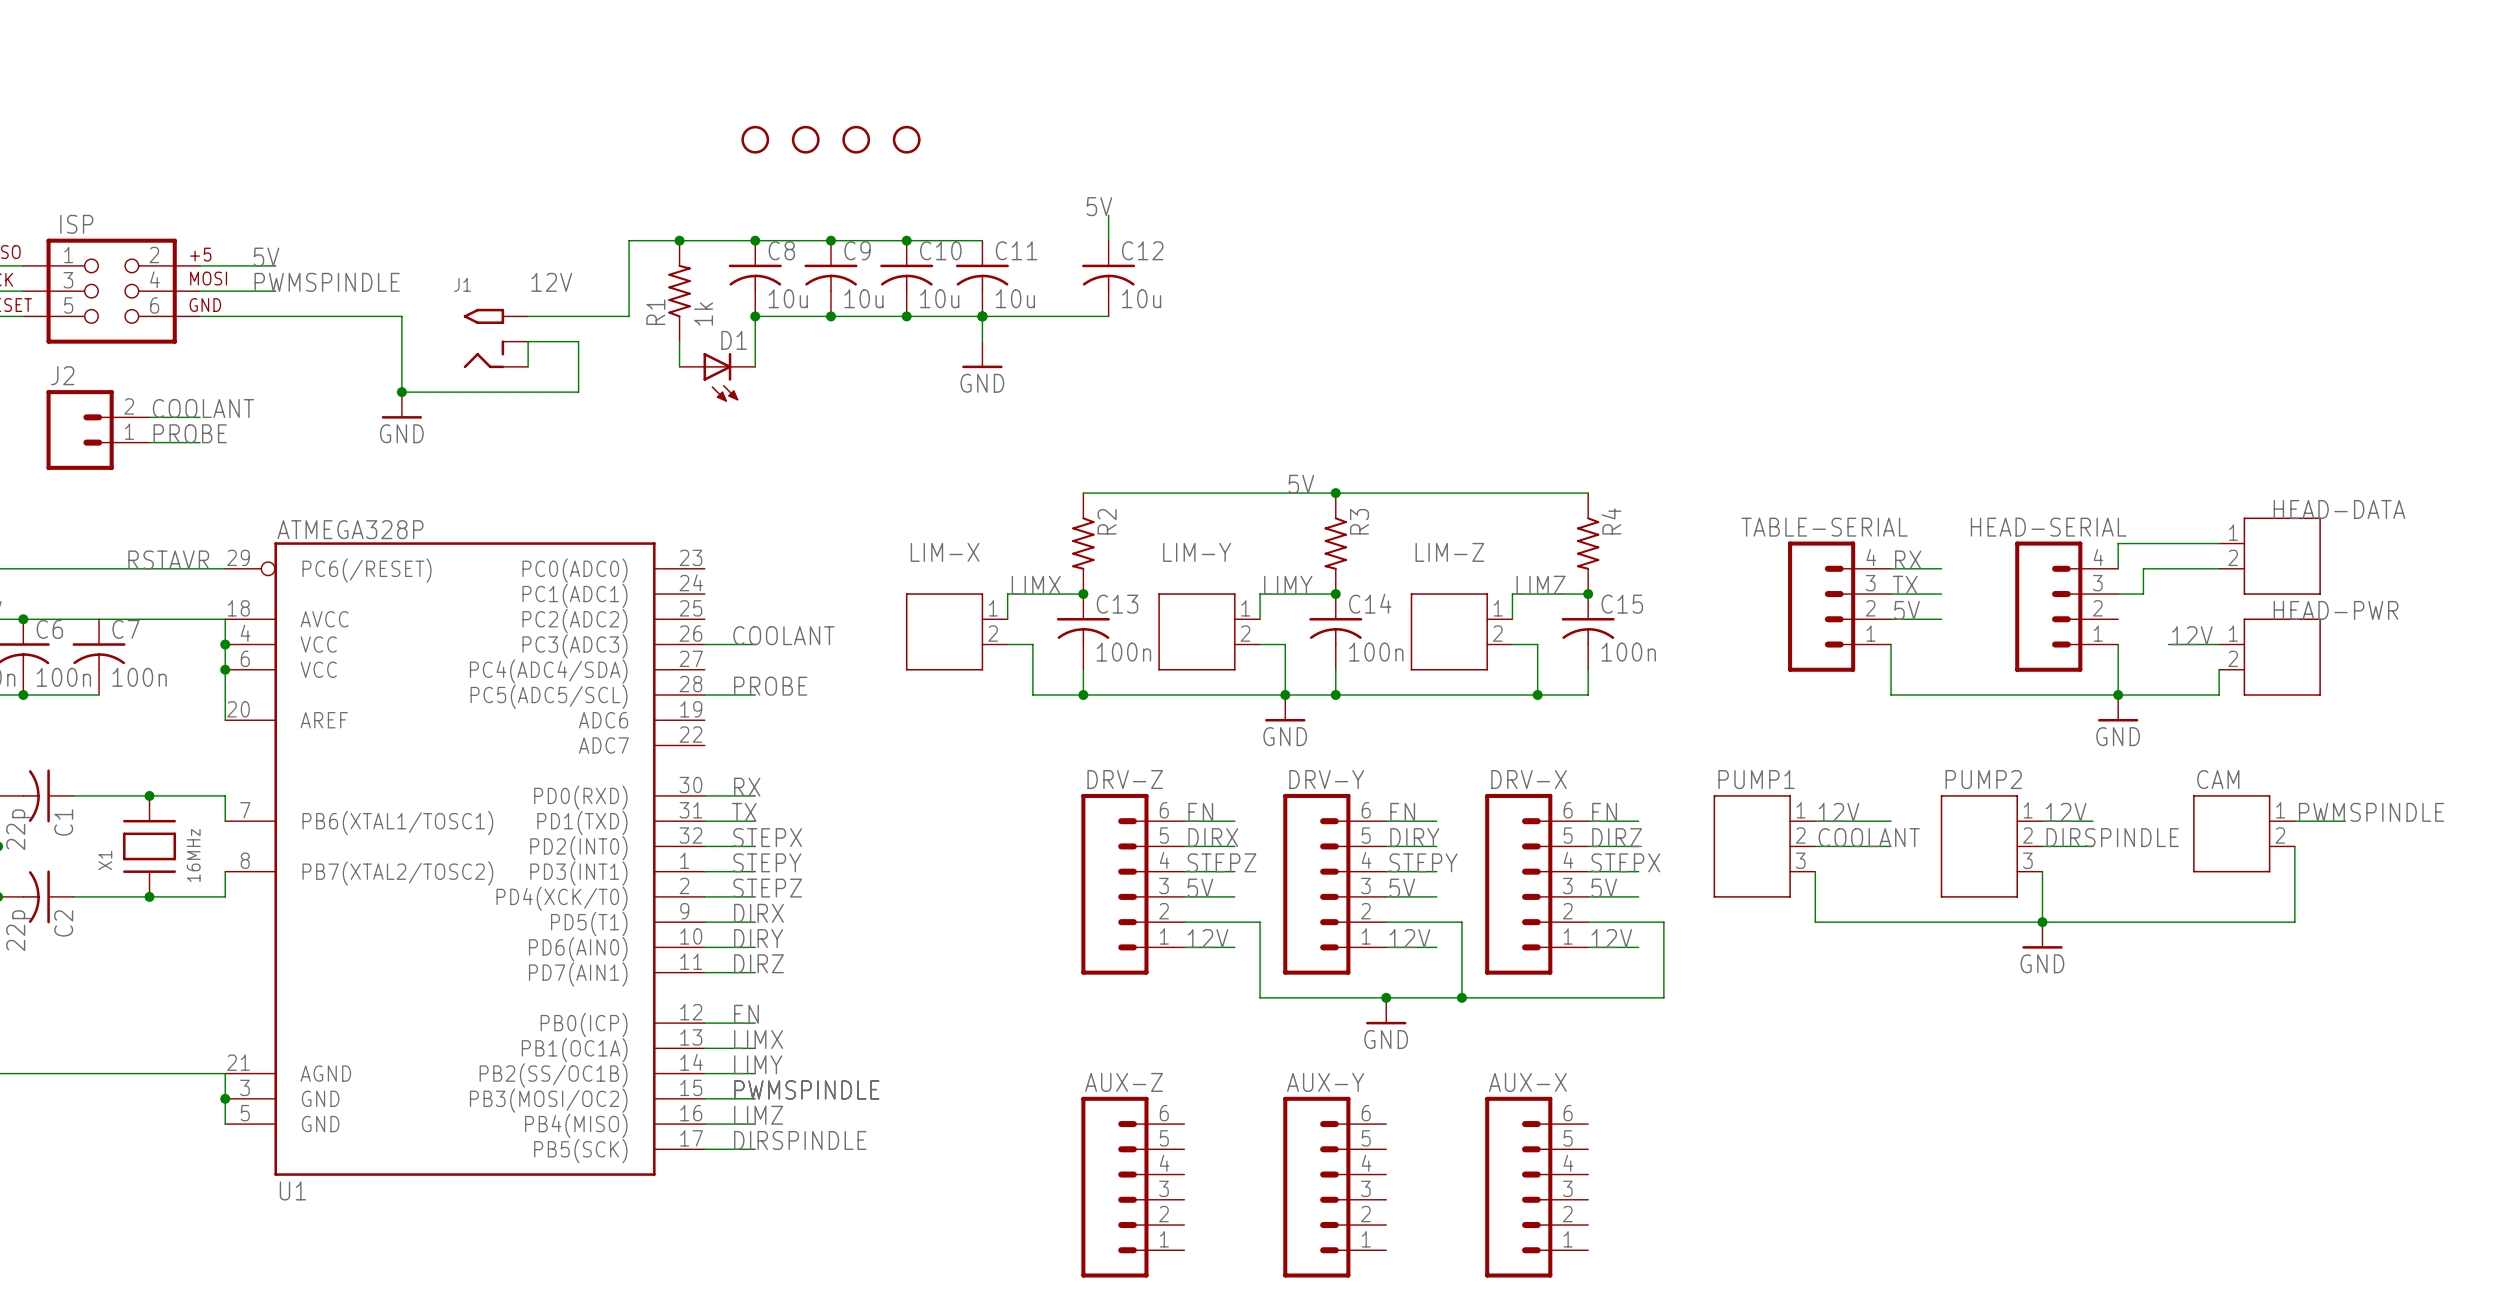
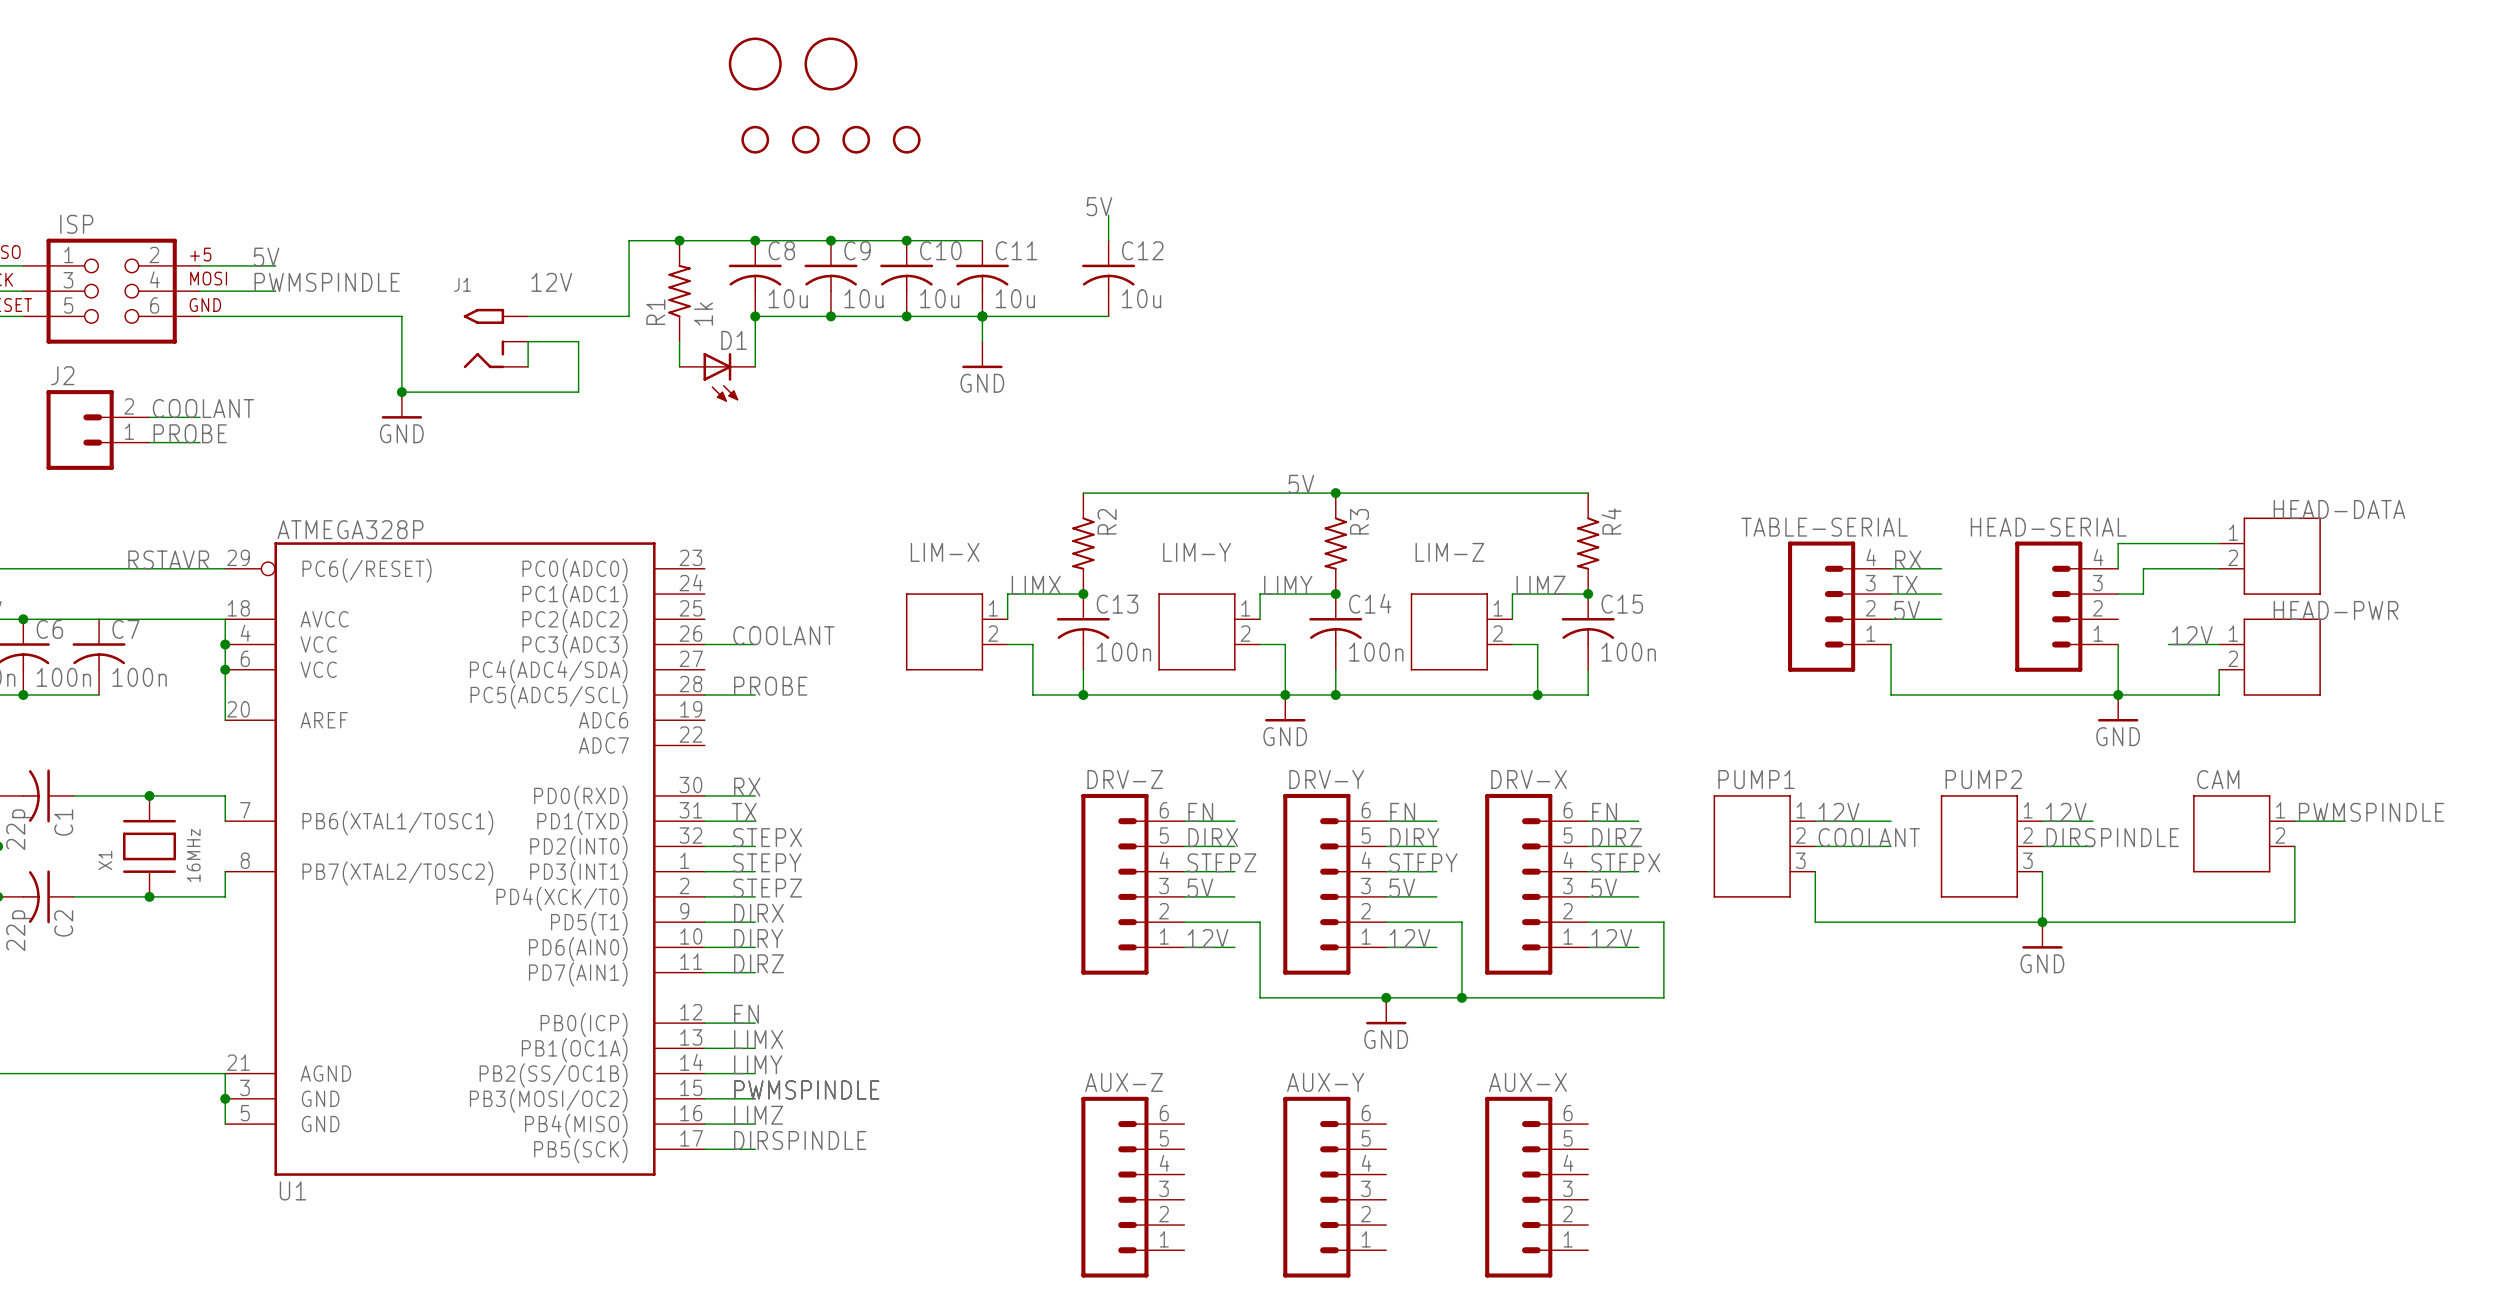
part: none -> (755, 64)
part: none -> (830, 64)

